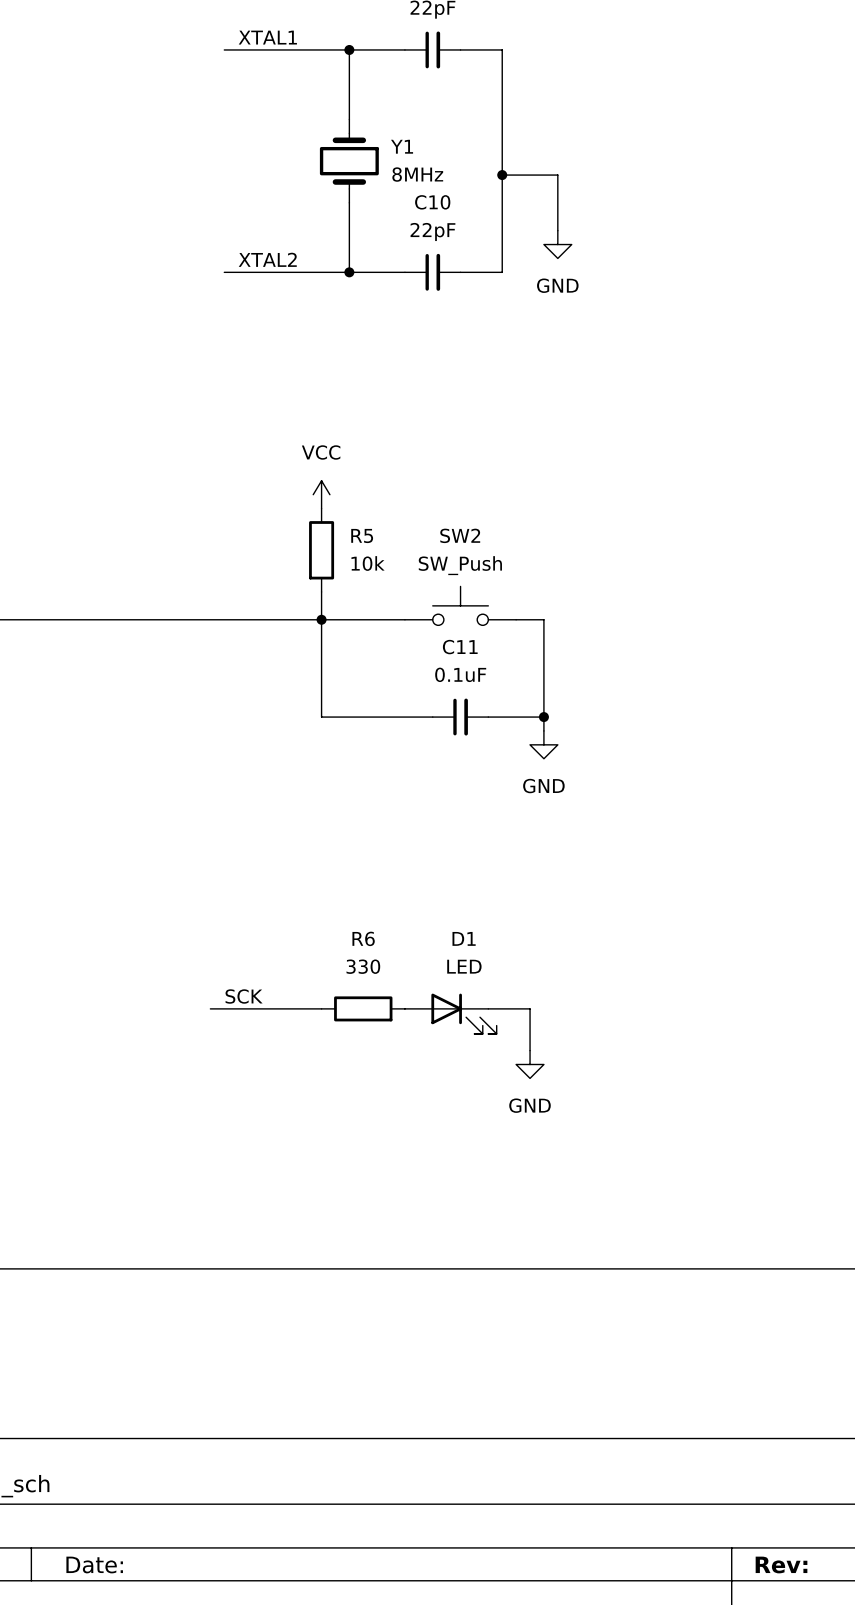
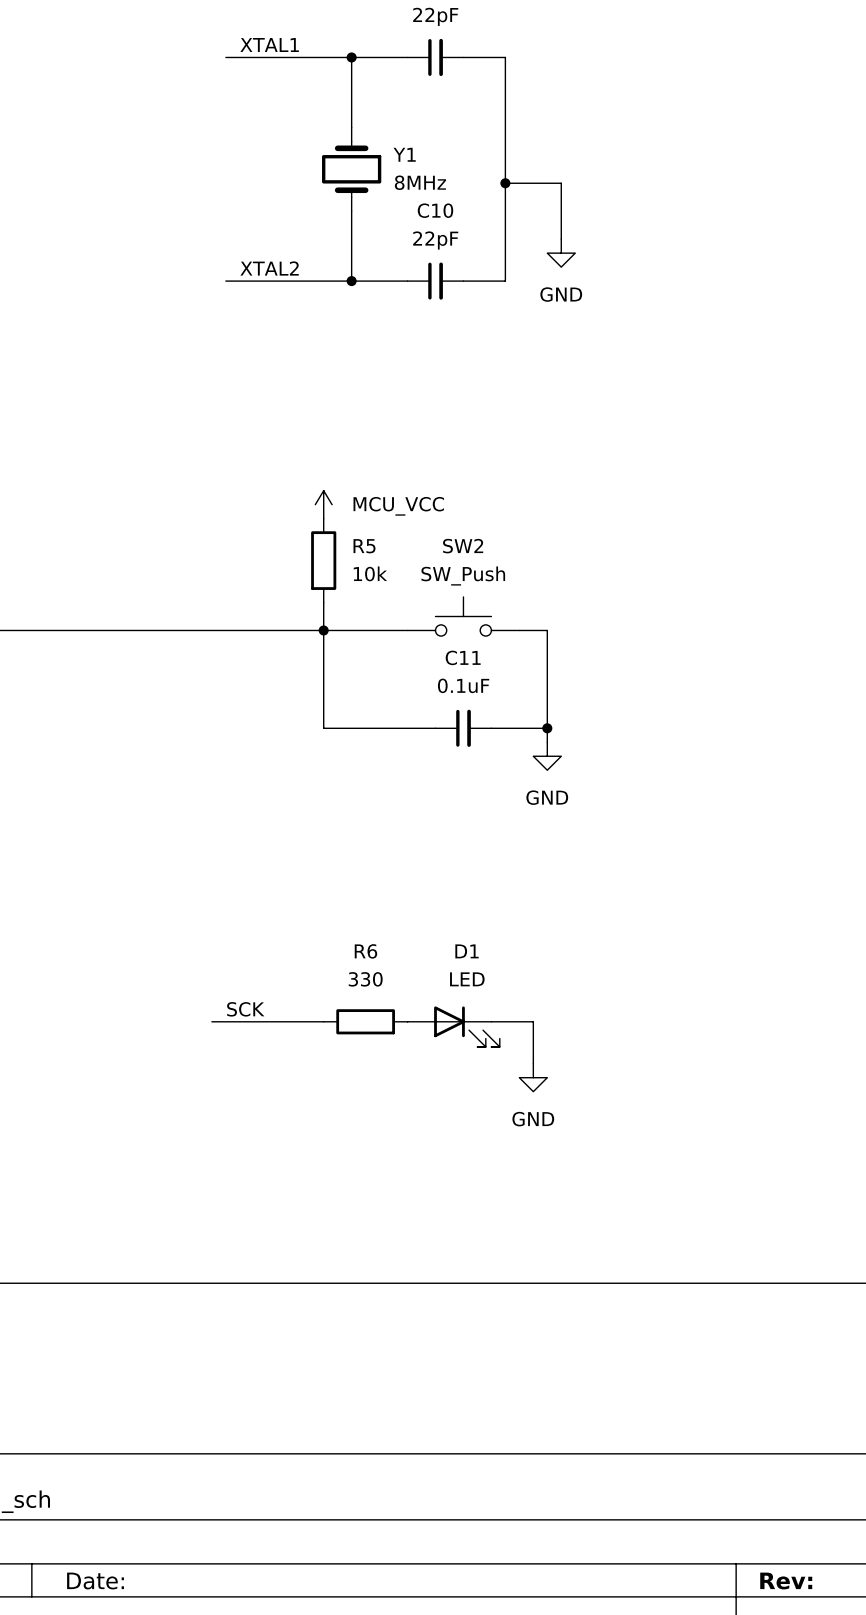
power symbol: VCC (321, 494) -> MCU_VCC (323, 504)

